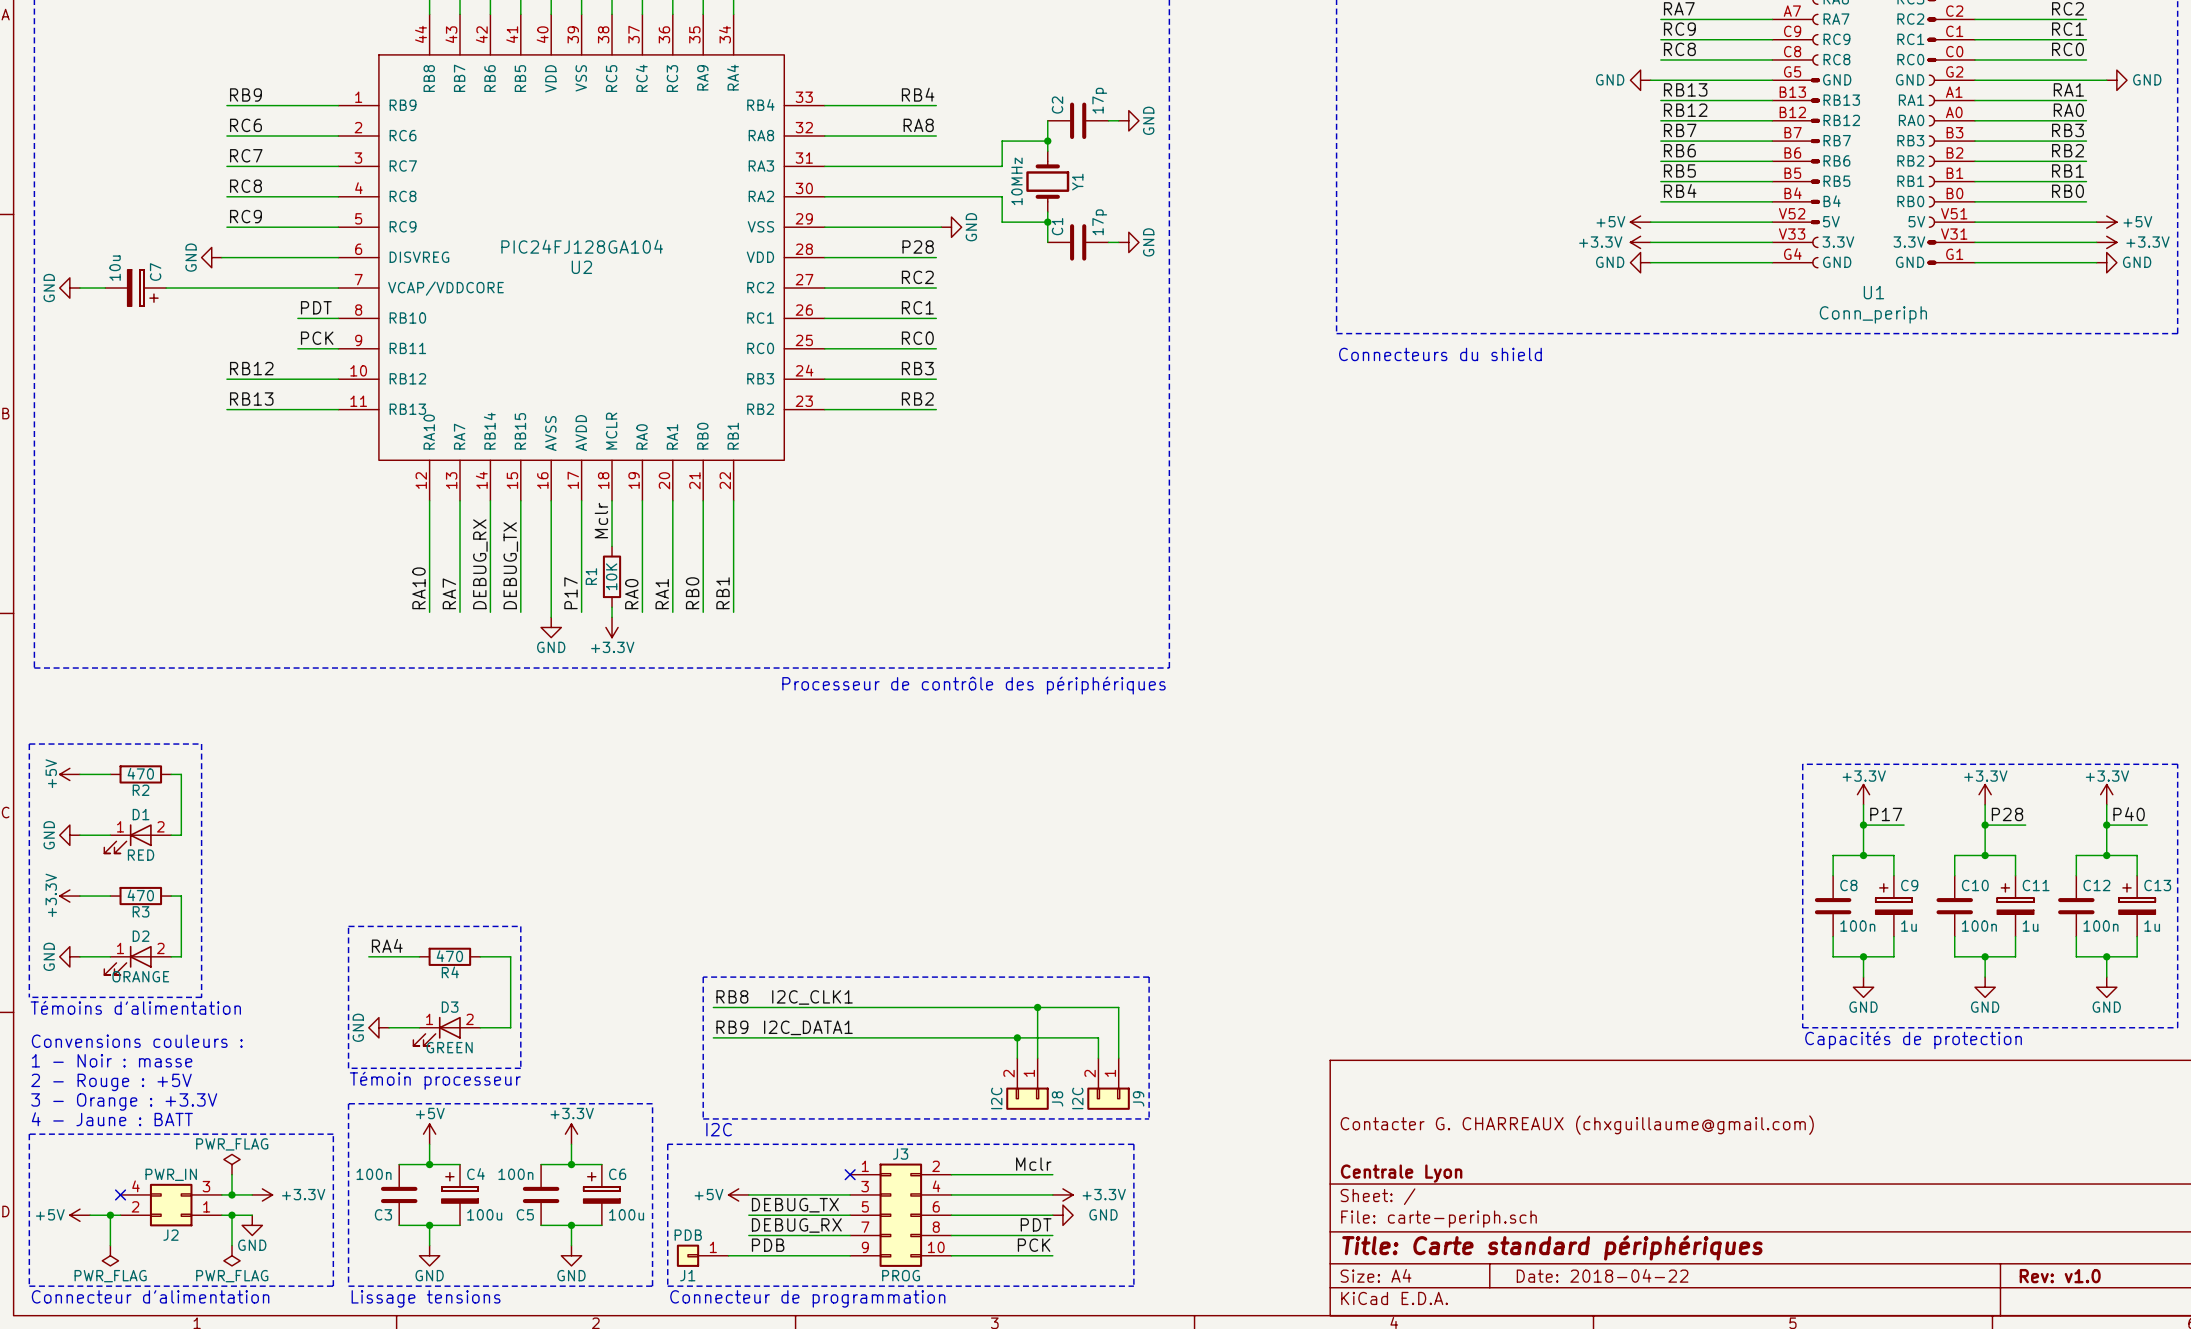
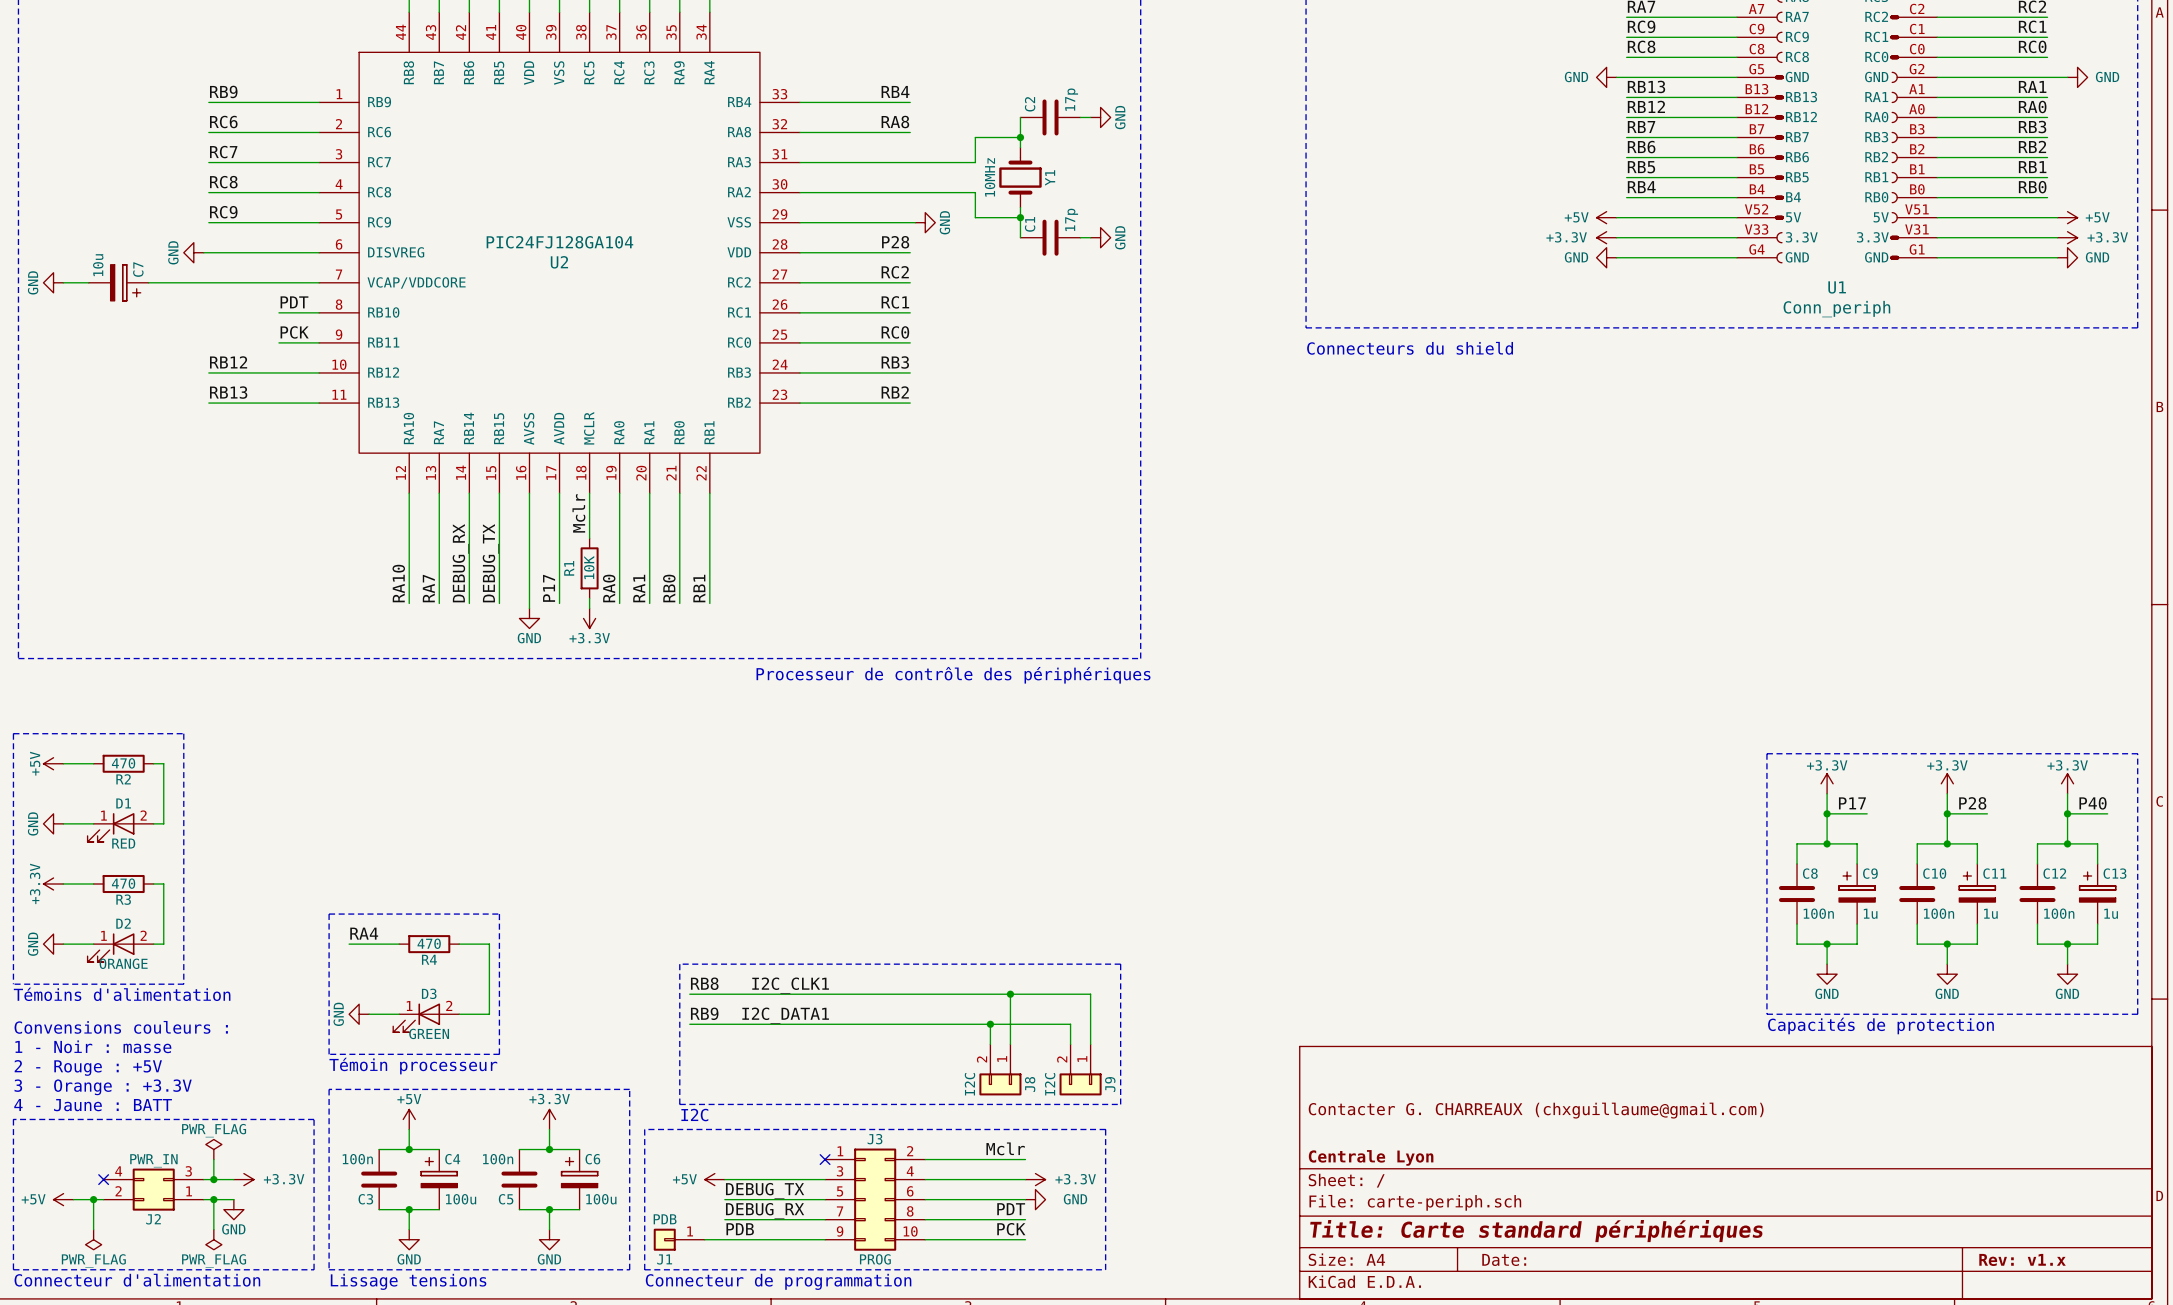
title block: Date: 2018-04-22 (1602, 1275) -> Date: (1504, 1259)
title block: Rev: v1.0 (2060, 1276) -> Rev: v1.x (2022, 1259)

